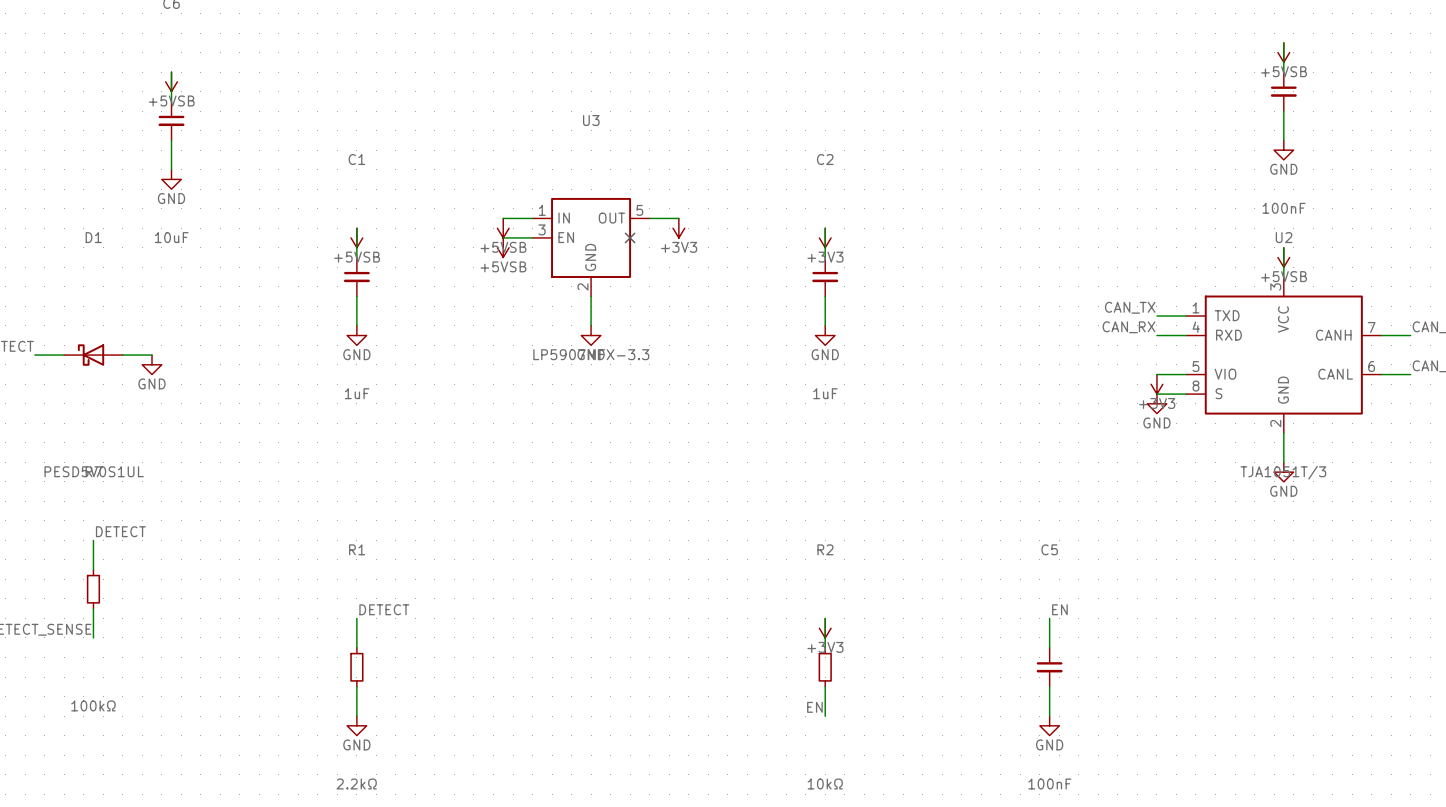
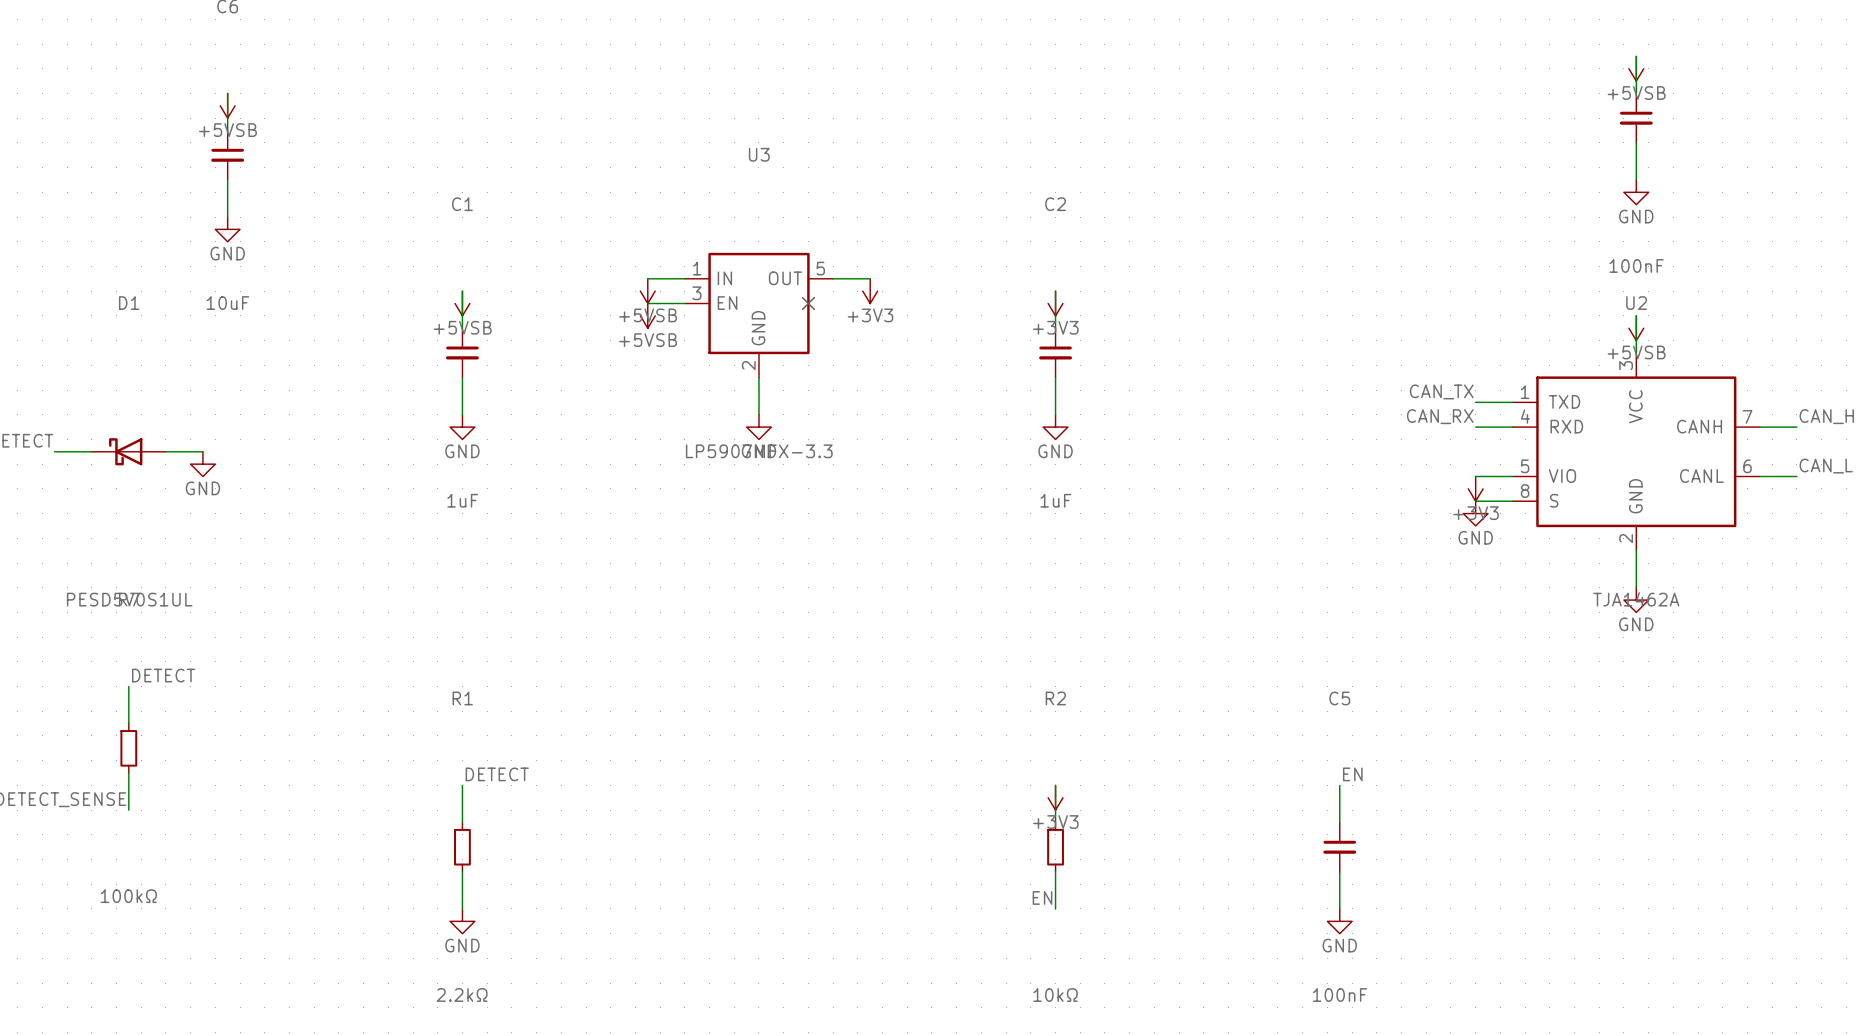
U2 value: TJA1051T/3 (1283, 472) -> TJA1462A (1636, 599)

